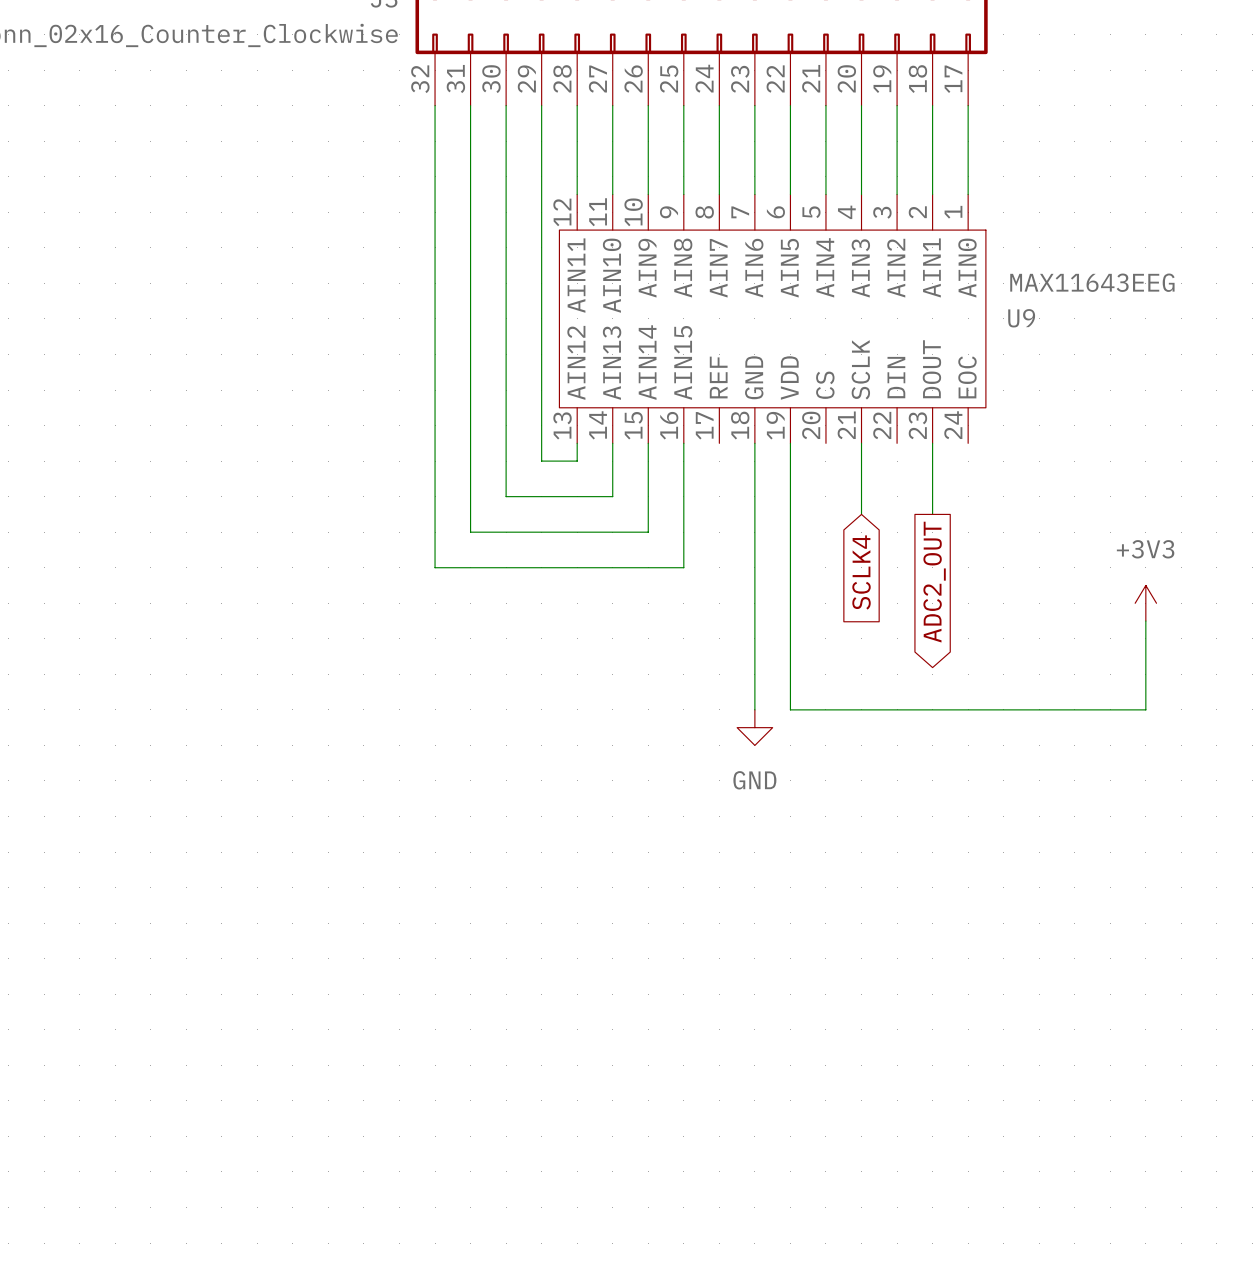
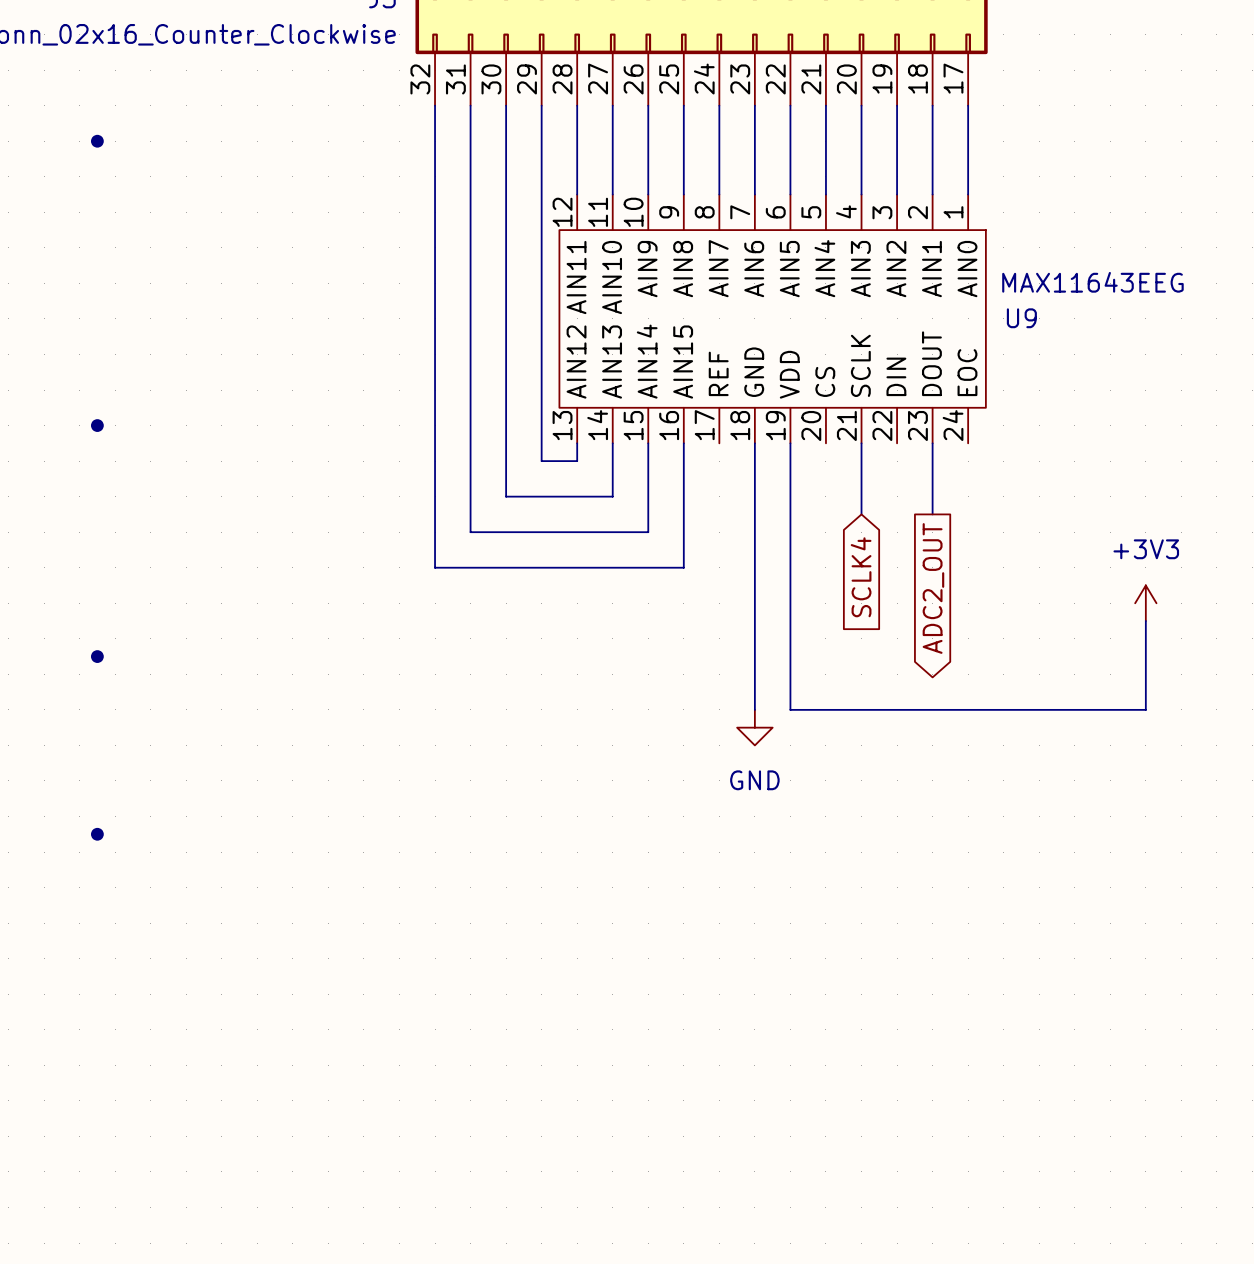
junction: none -> (97, 141)
junction: none -> (97, 425)
junction: none -> (97, 656)
junction: none -> (97, 834)

